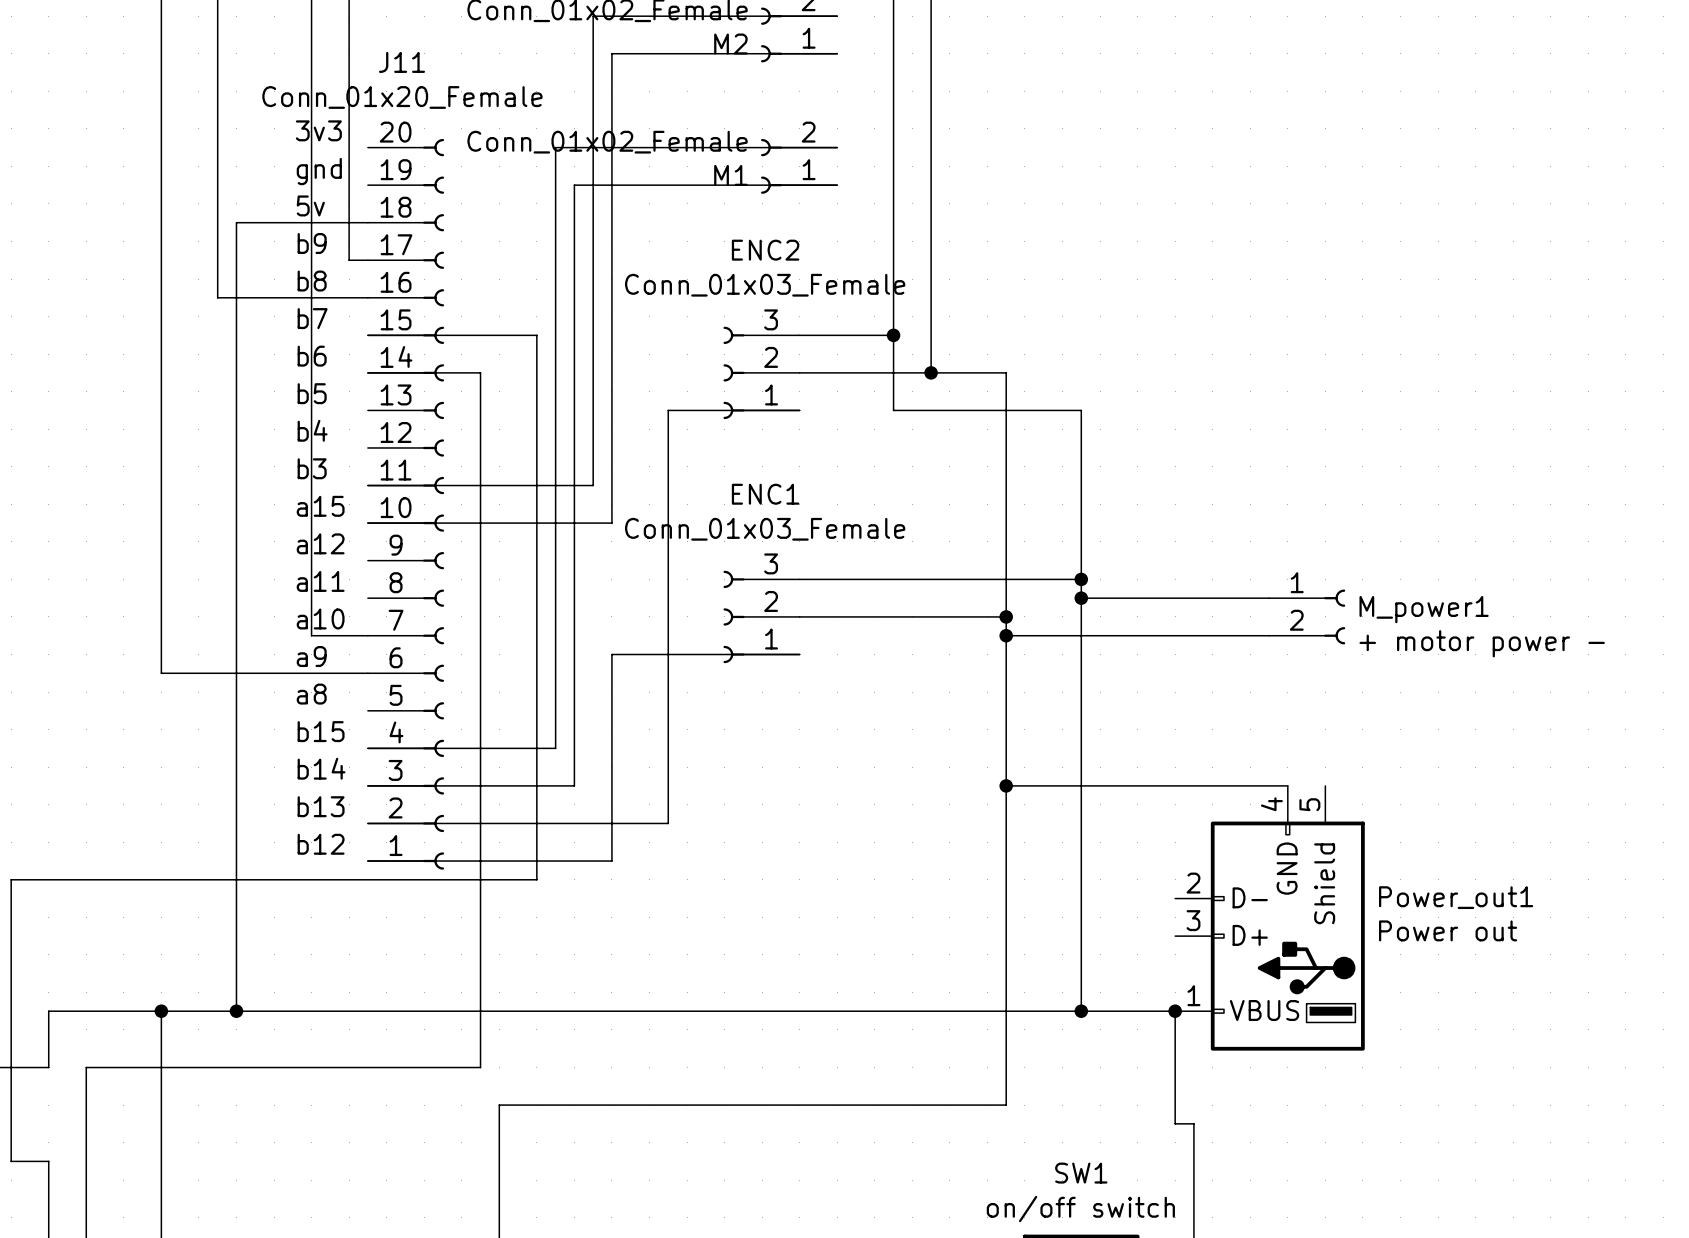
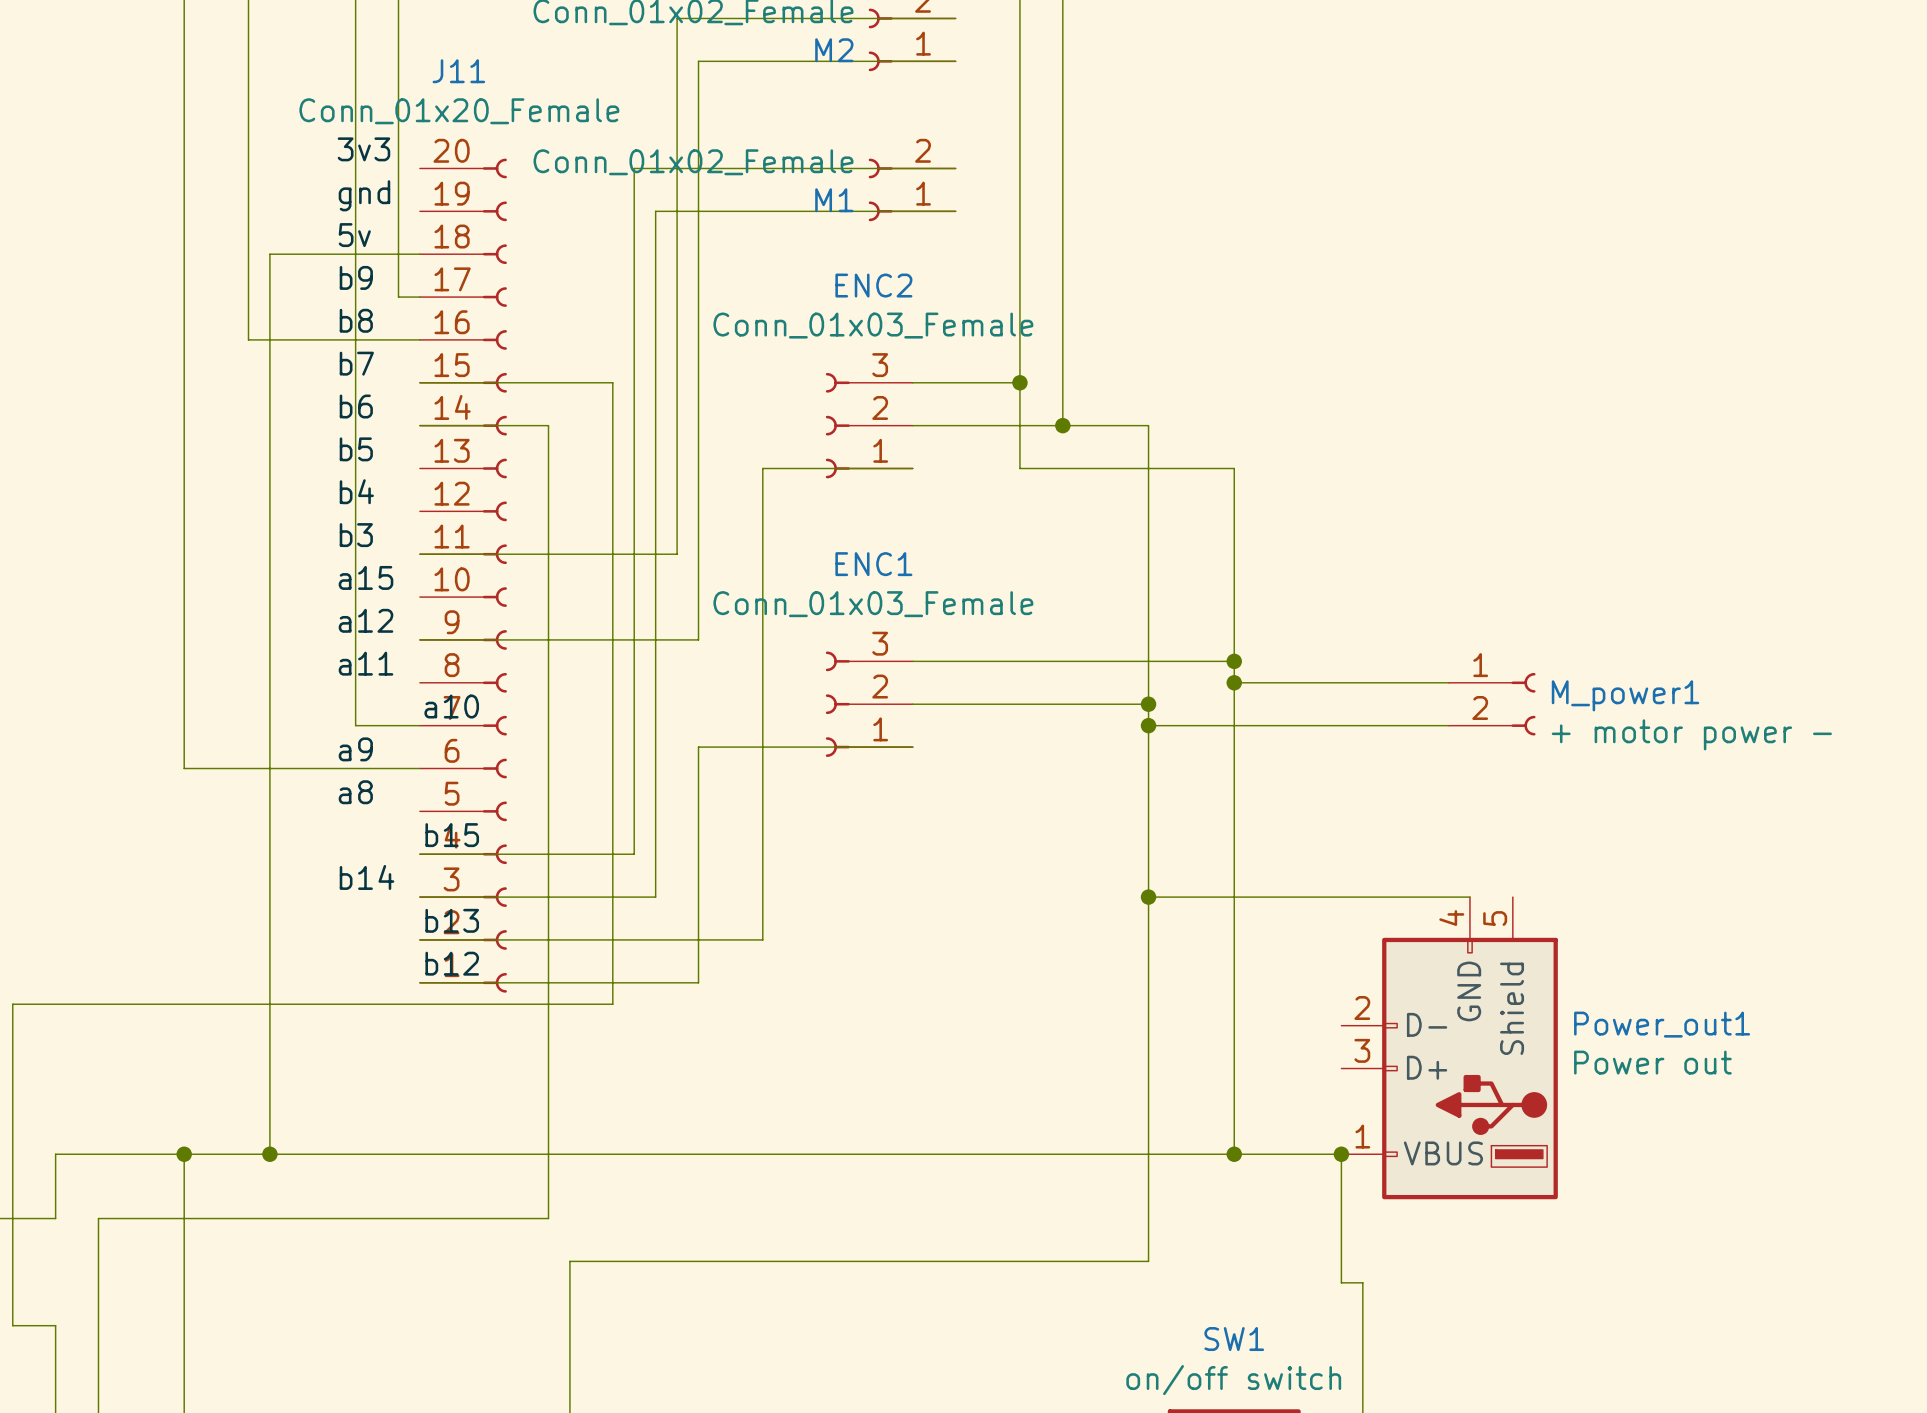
wire: (367, 523) (611, 523) -> (419, 639) (698, 639) (698, 597)
label position: a10 (320, 618) -> a10 (451, 706)
label position: b15 (321, 731) -> b15 (452, 835)
label position: b13 (321, 806) -> b13 (452, 920)
label position: b12 (321, 844) -> b12 (452, 963)

